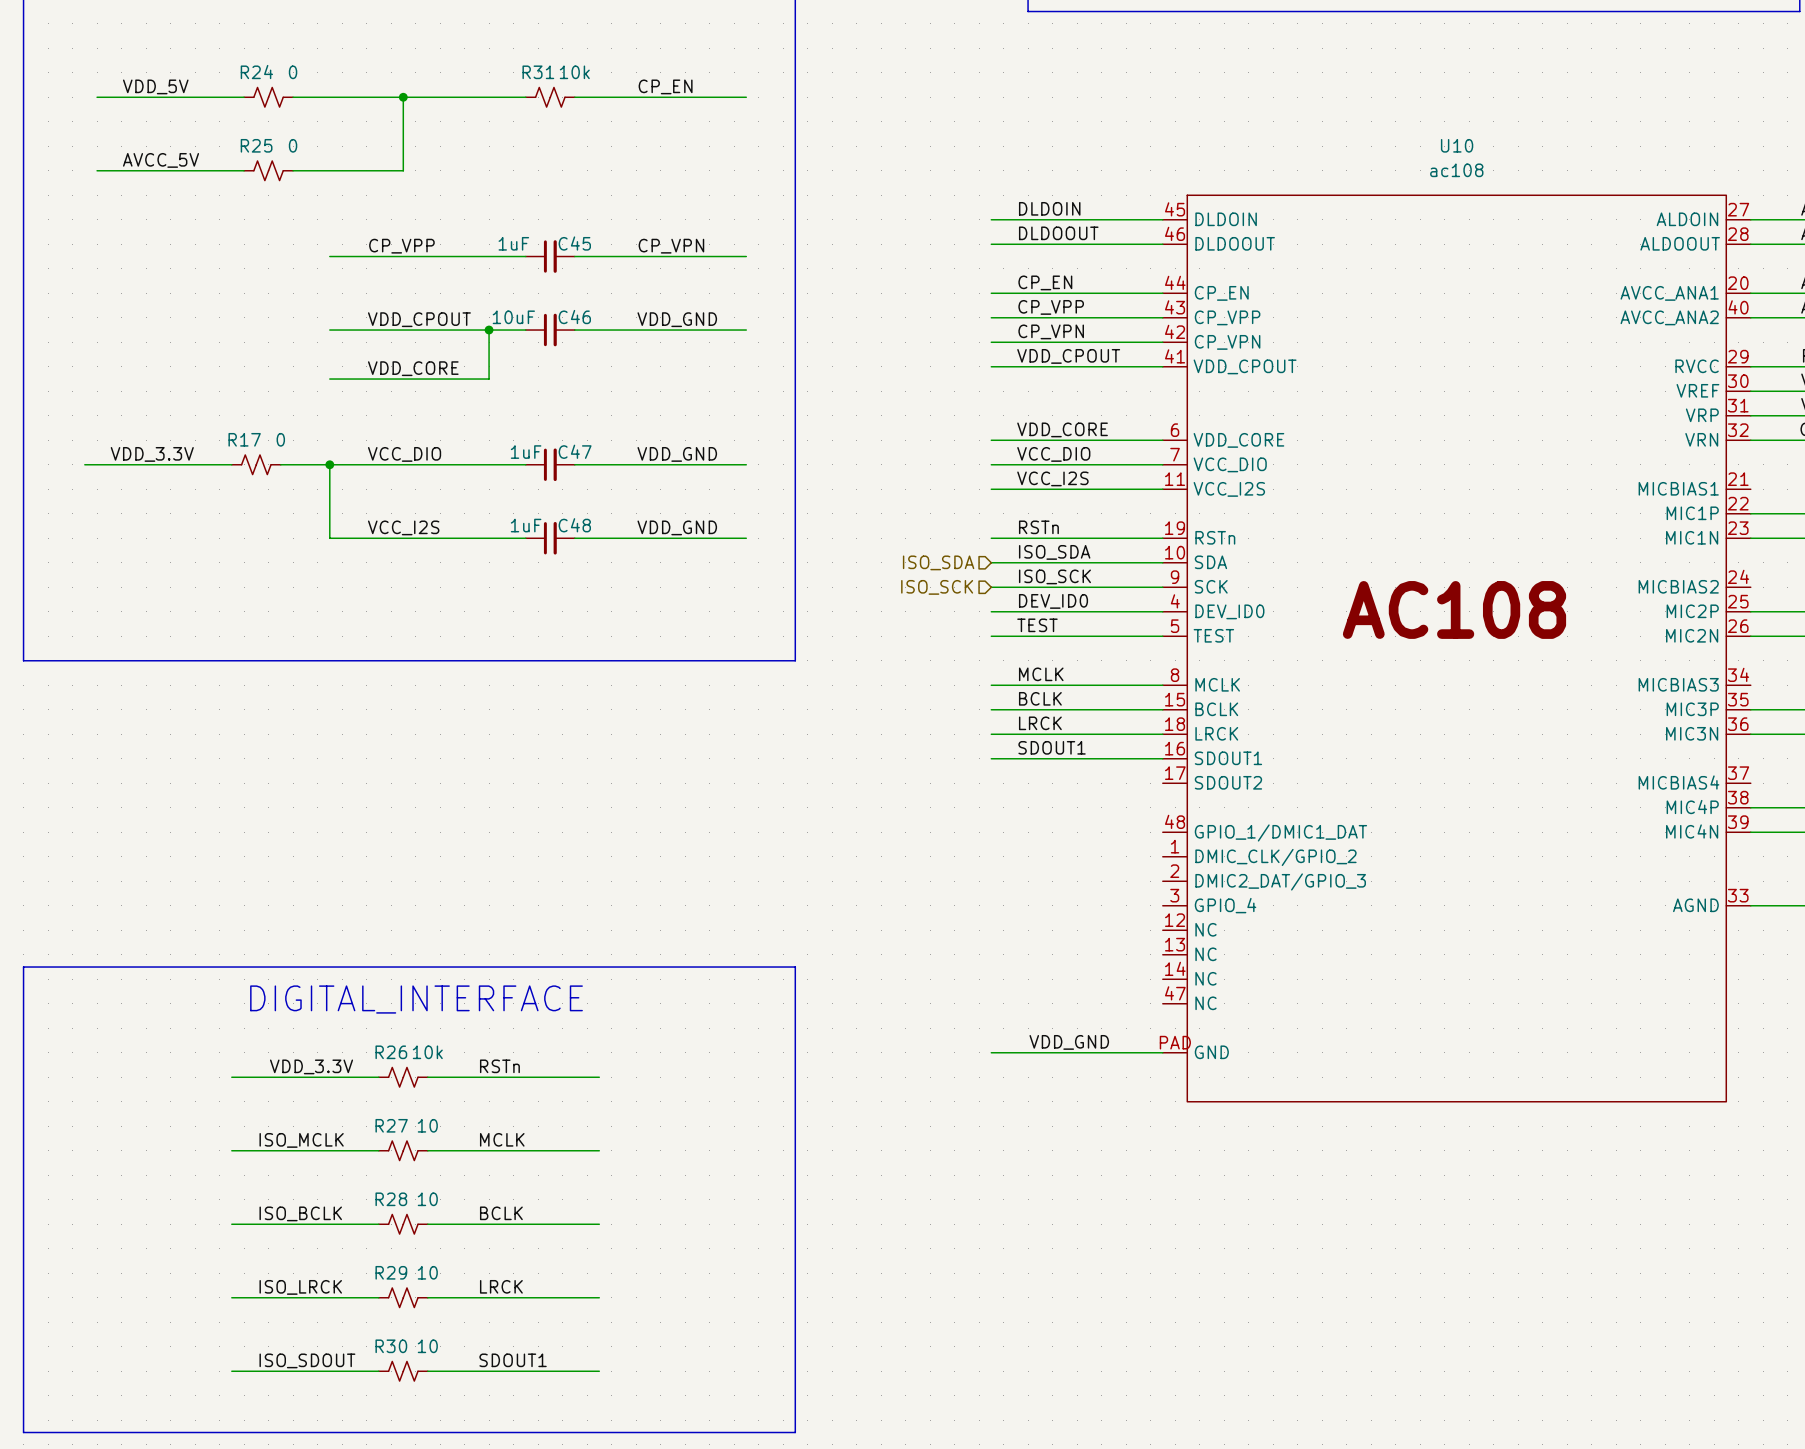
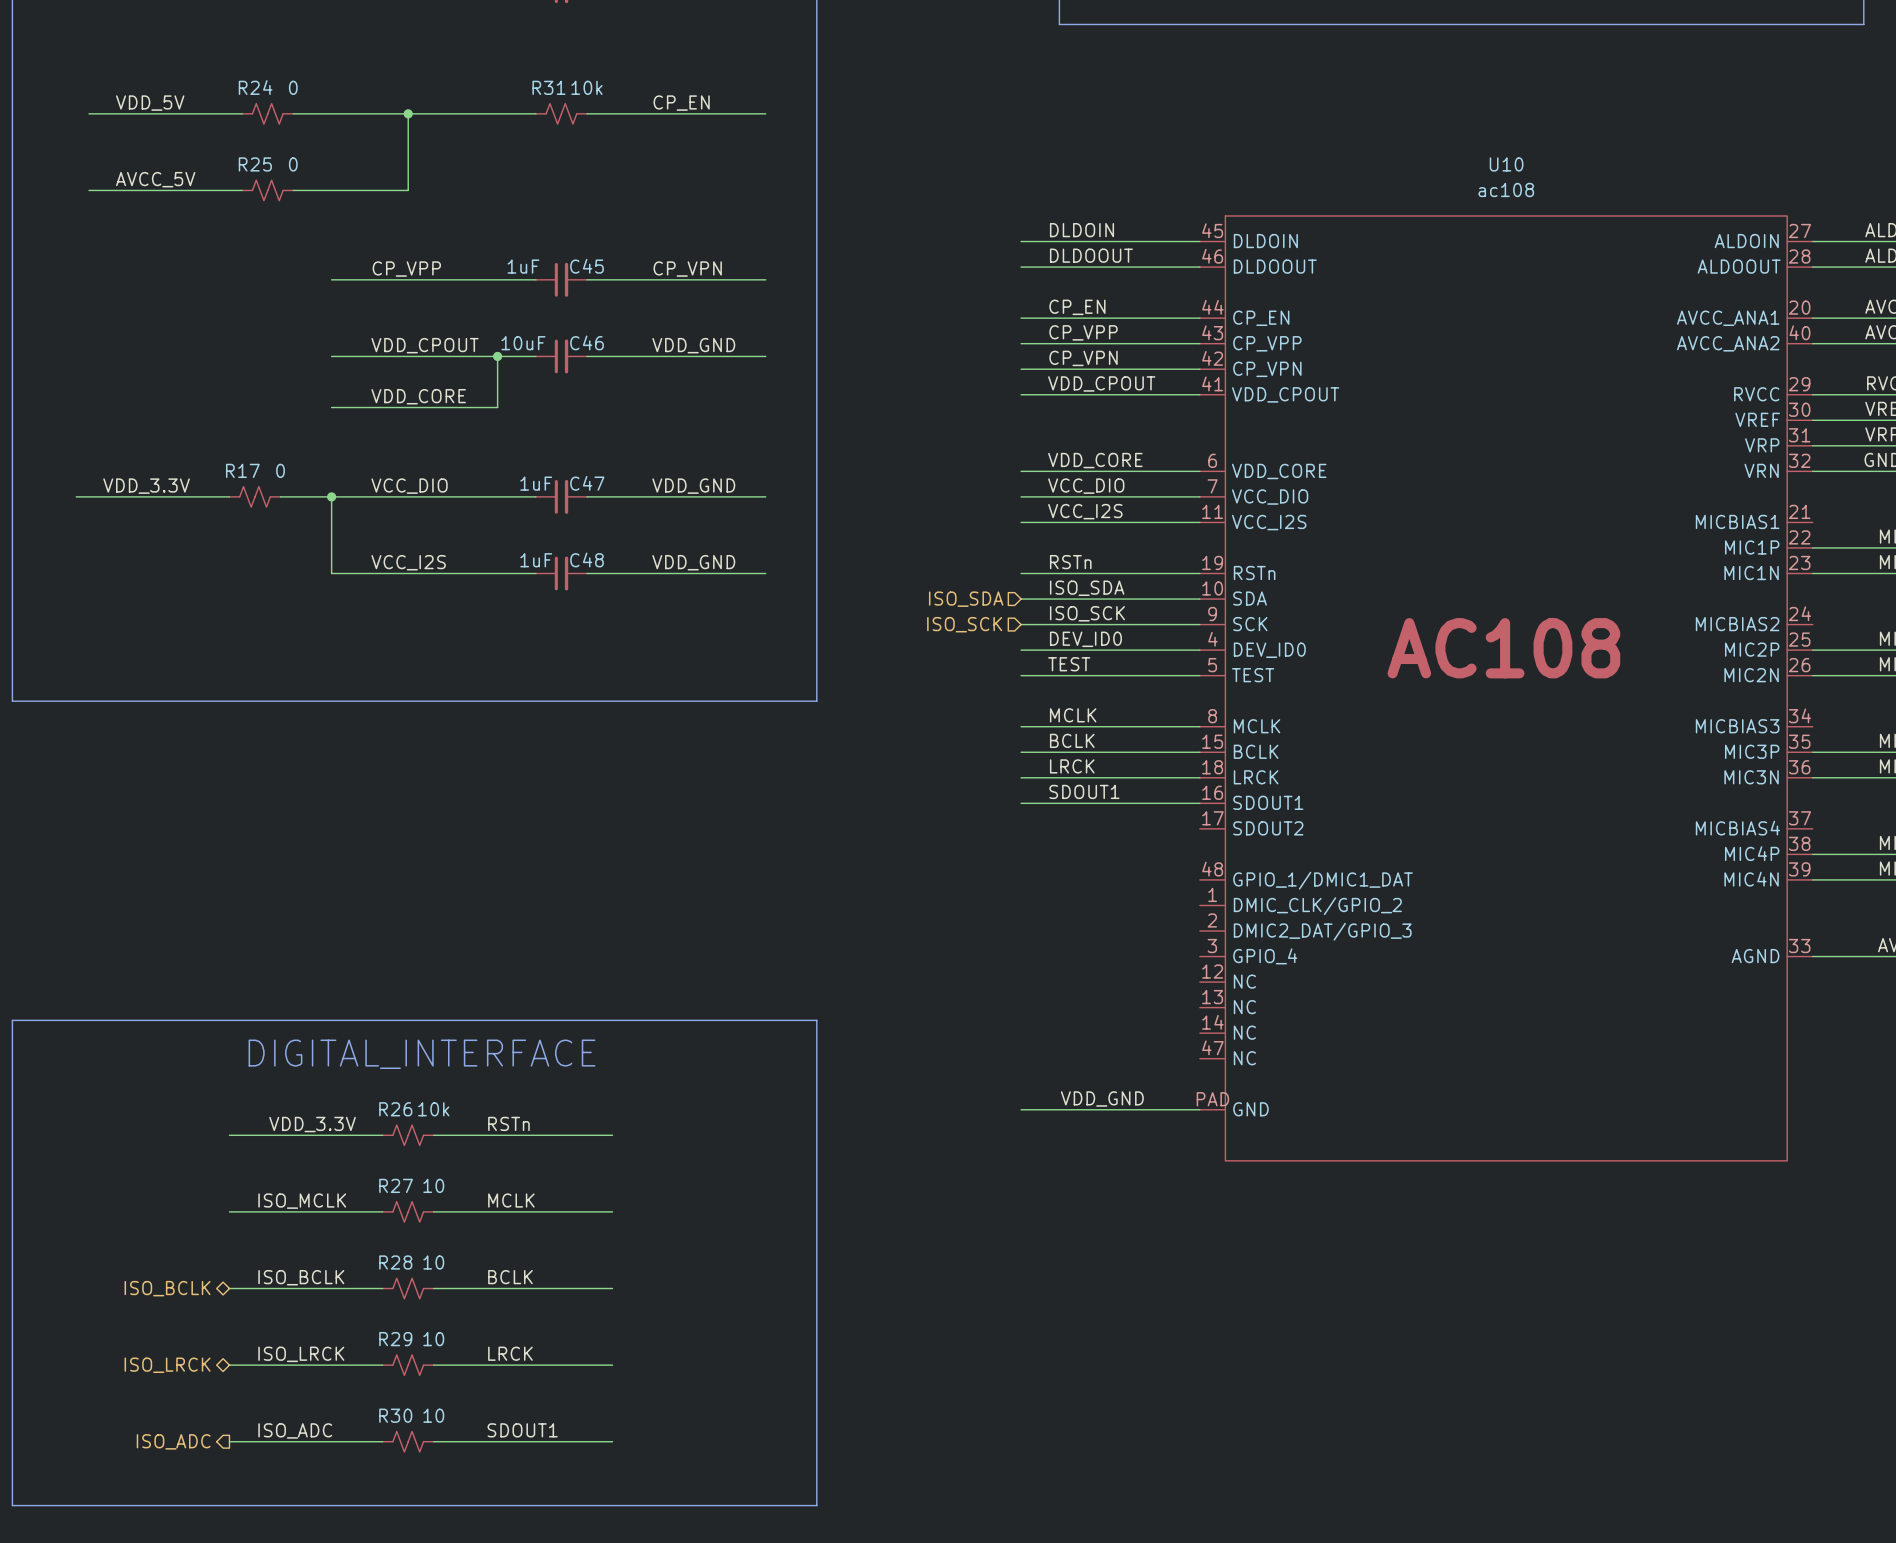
hierarchical label: none -> ISO_BCLK (167, 1288)
hierarchical label: none -> ISO_LRCK (167, 1365)
label: ISO_SDOUT (307, 1360) -> ISO_ADC (295, 1430)
hierarchical label: none -> ISO_ADC (173, 1441)

